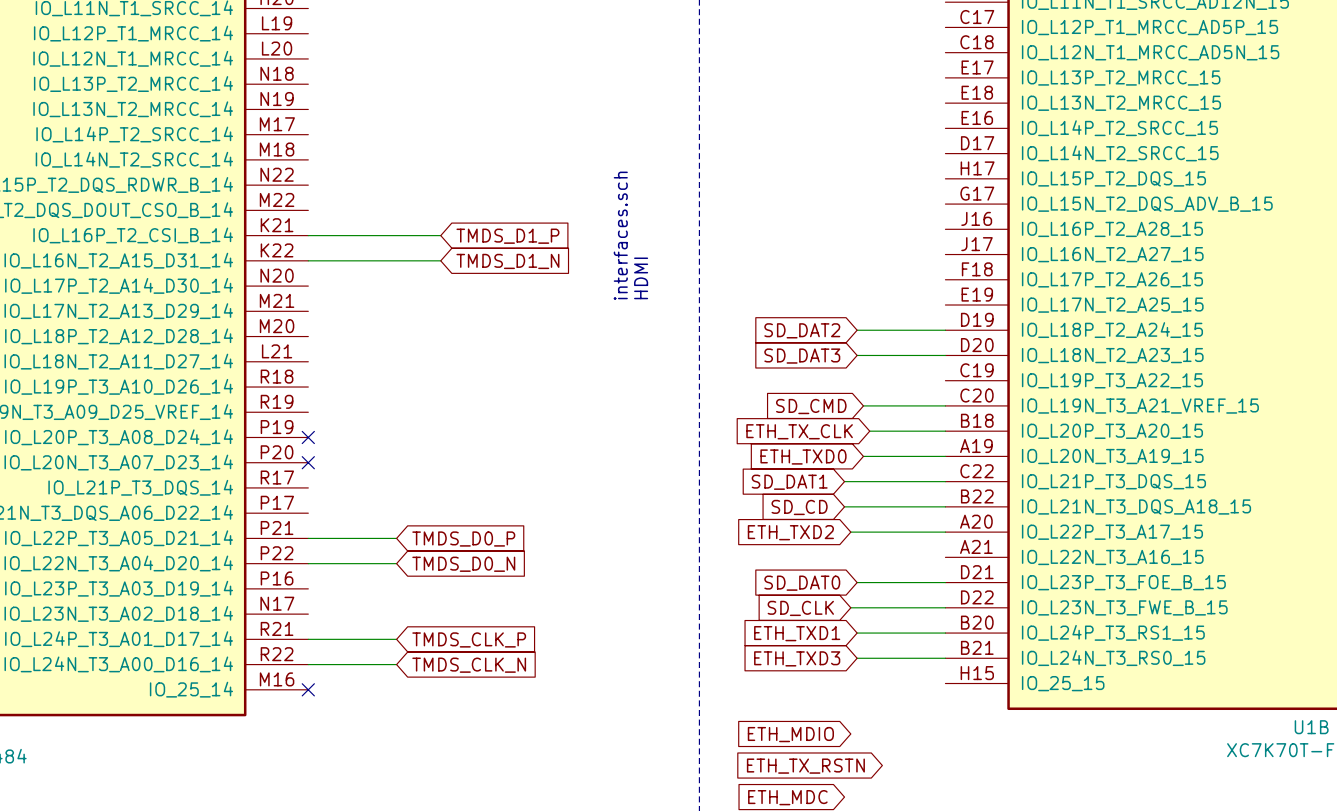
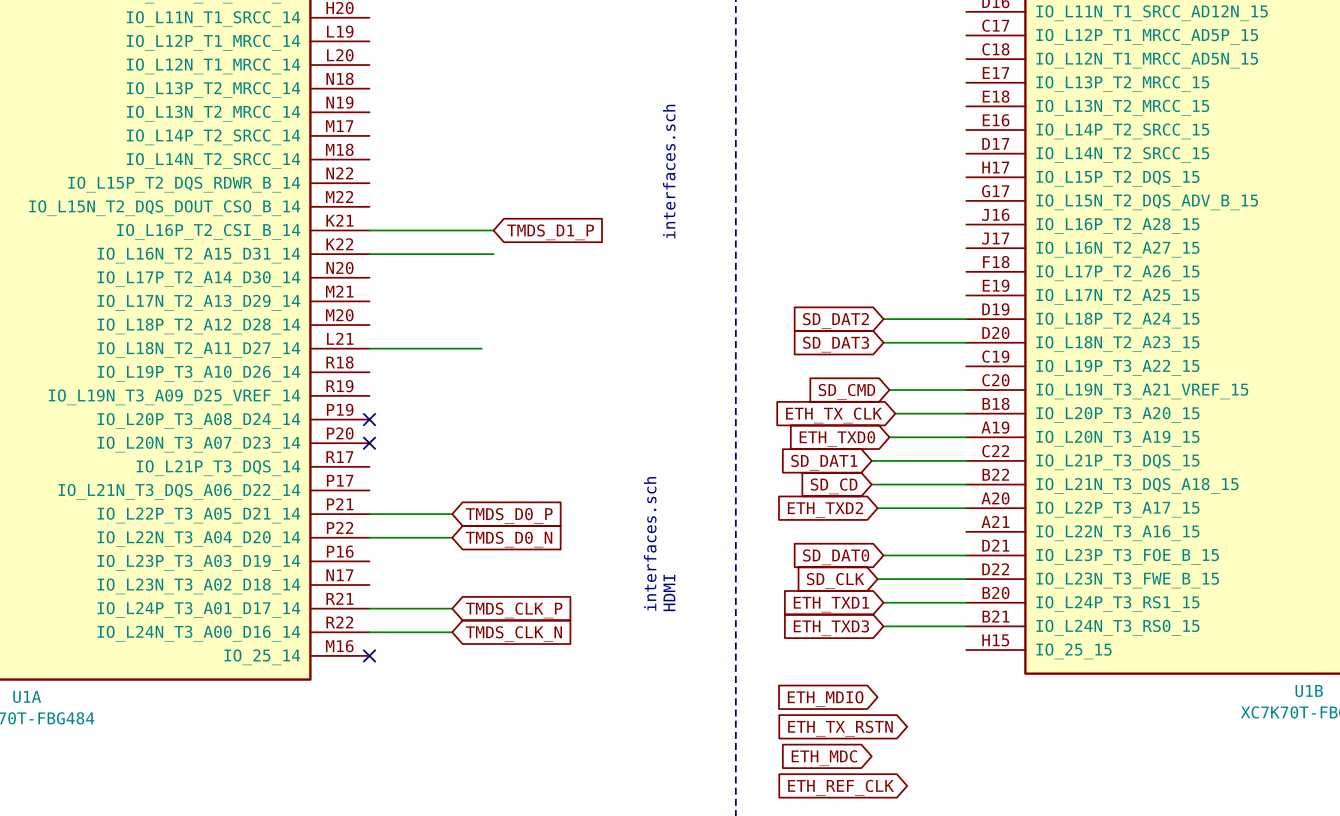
text position: interfaces.sch (620, 235) -> interfaces.sch (669, 171)
global label: TMDS_D1_N (507, 261) -> none
text: HDMI (641, 278) -> none
wire: none -> (369, 348) (481, 348)
text: none -> interfaces.sch (650, 543)
text: none -> HDMI (669, 592)

